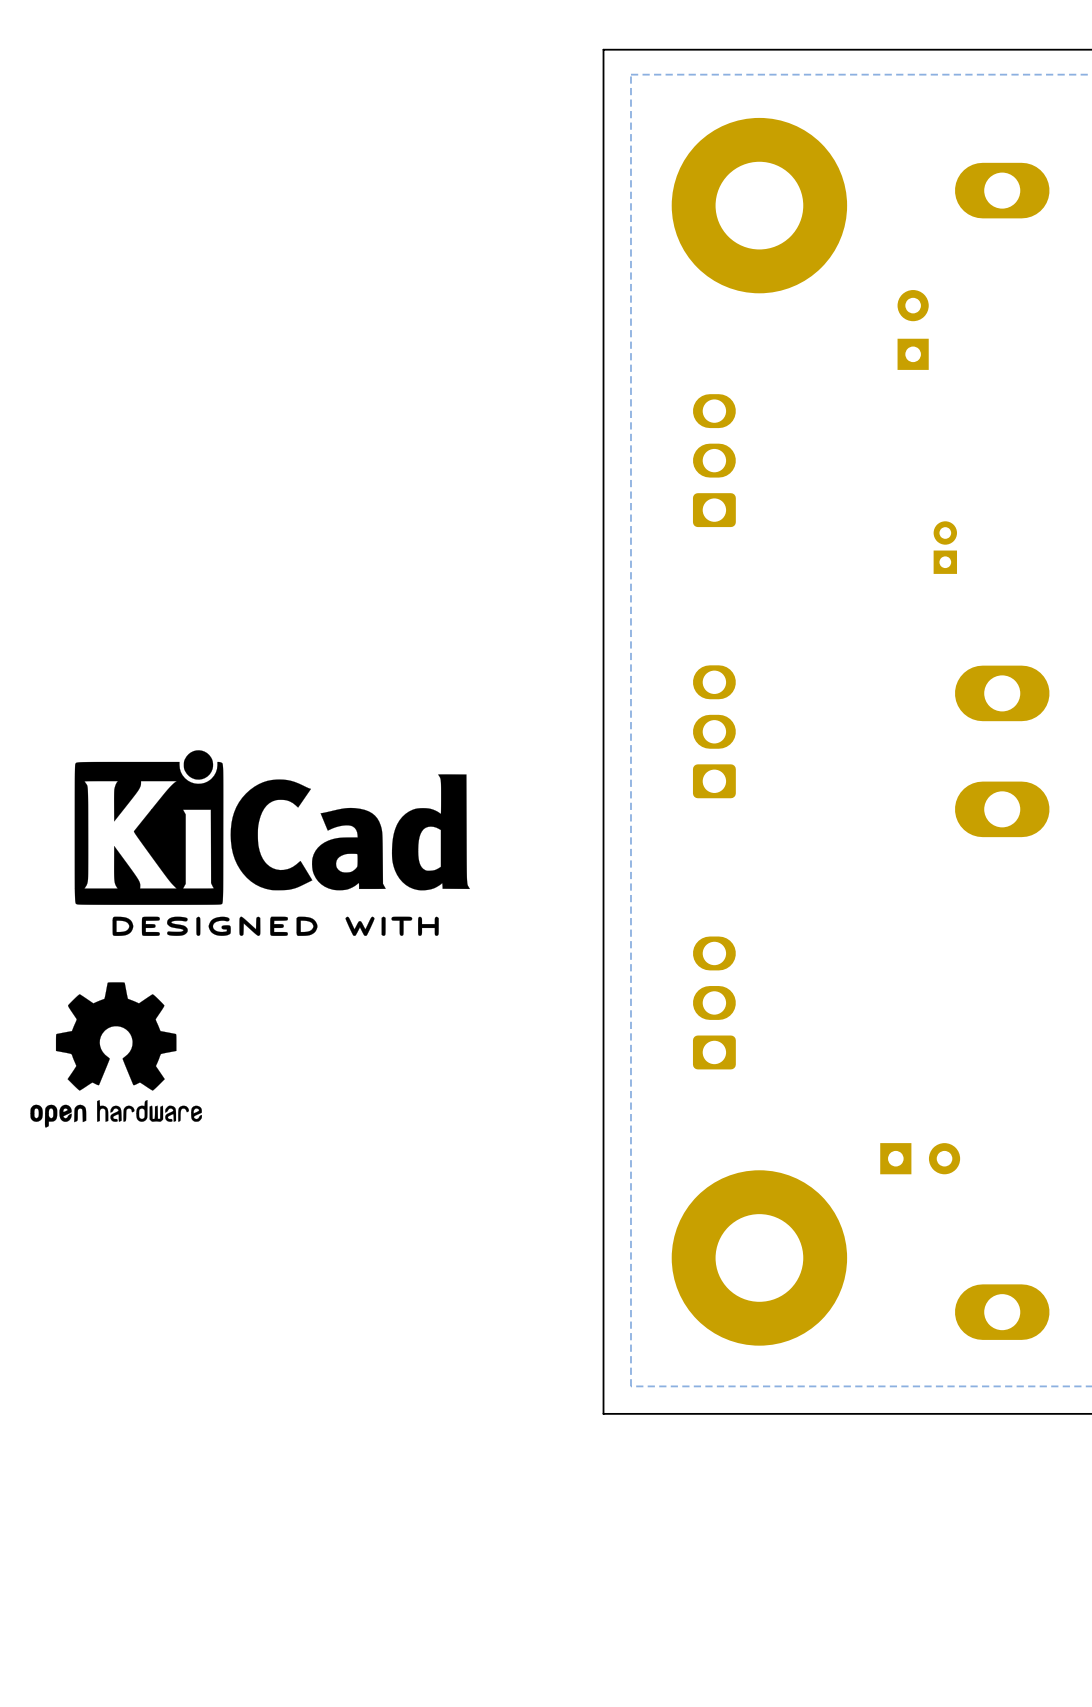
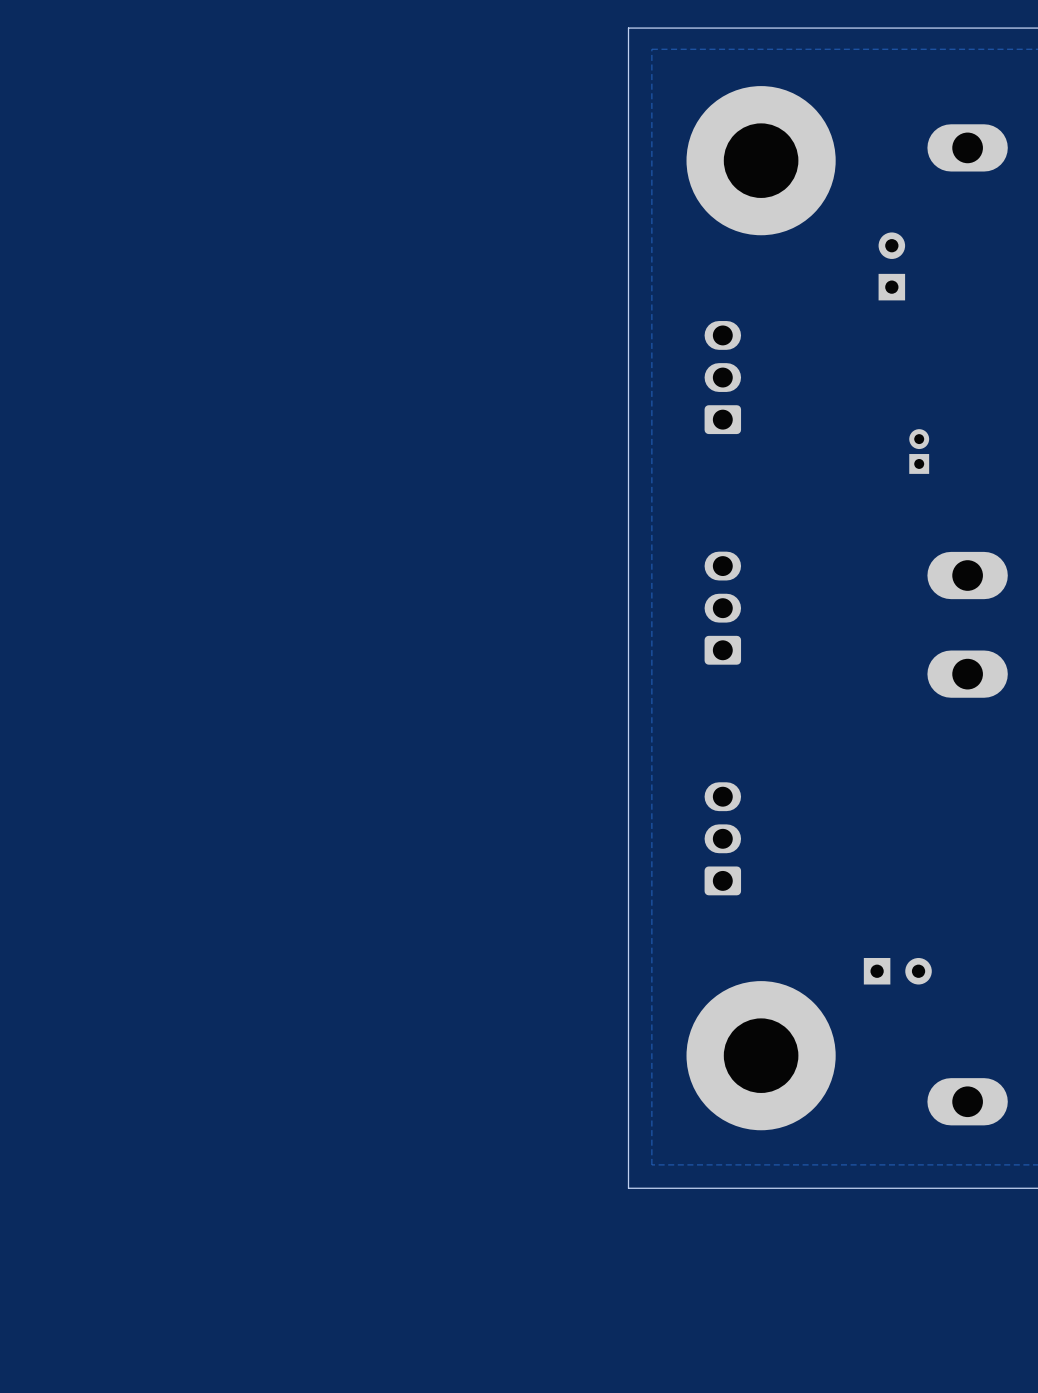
drawing: [74, 750, 470, 936] -> none
drawing: [30, 982, 202, 1128] -> none

